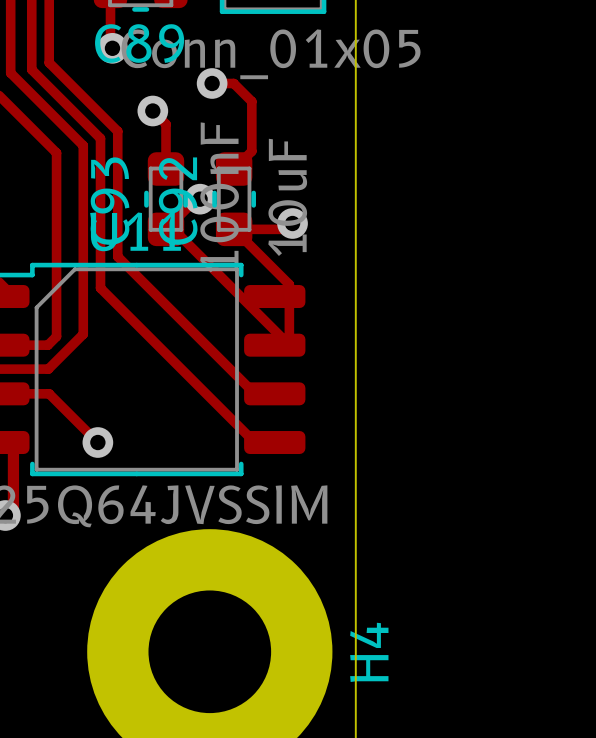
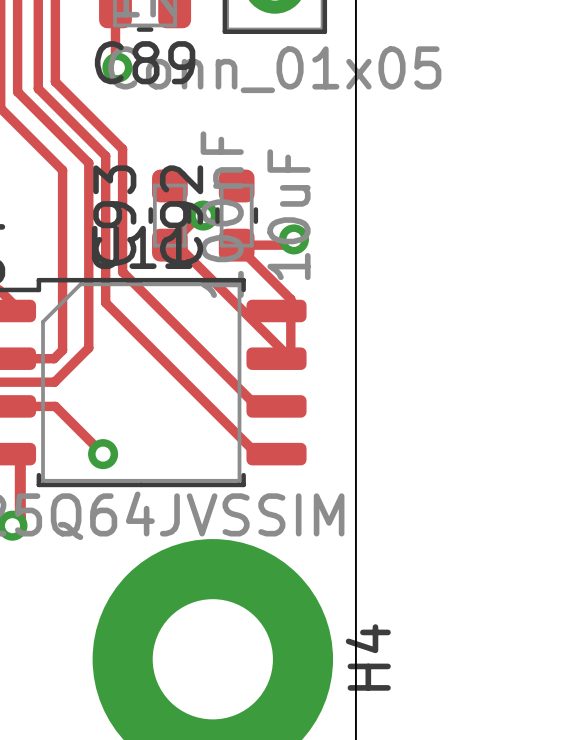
track: (212, 83) (233, 83) (251, 101) (251, 151) (234, 168) -> none
via: (212, 83) -> none
track: (152, 111) (166, 124) (166, 168) -> none
via: (152, 111) -> none

